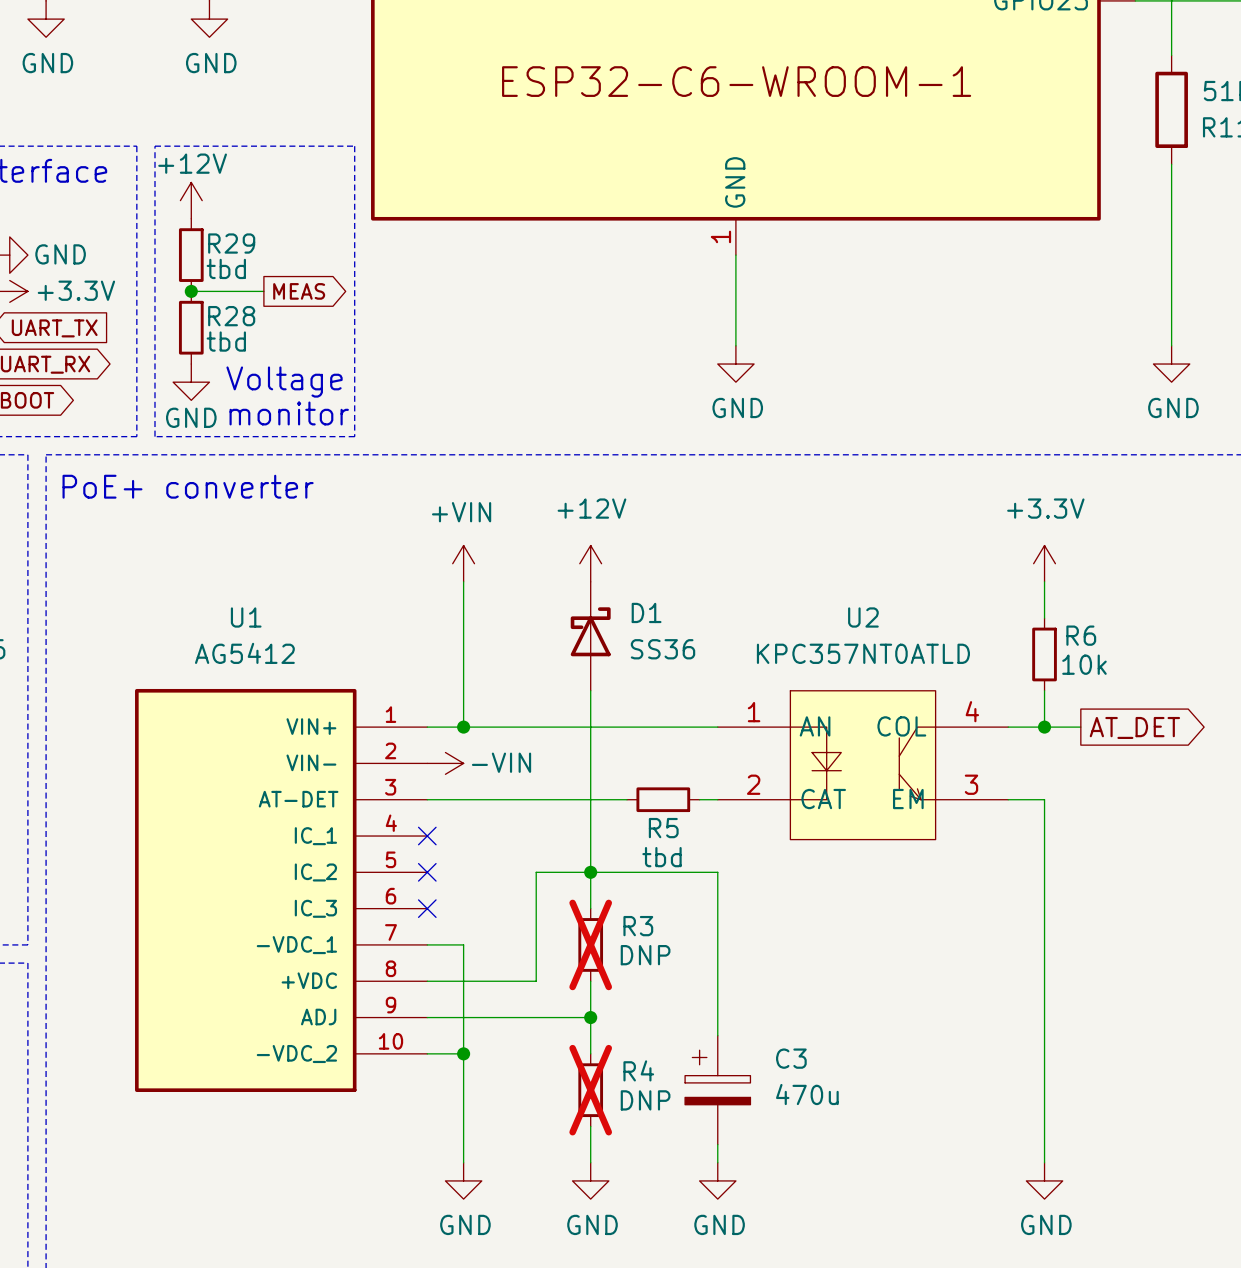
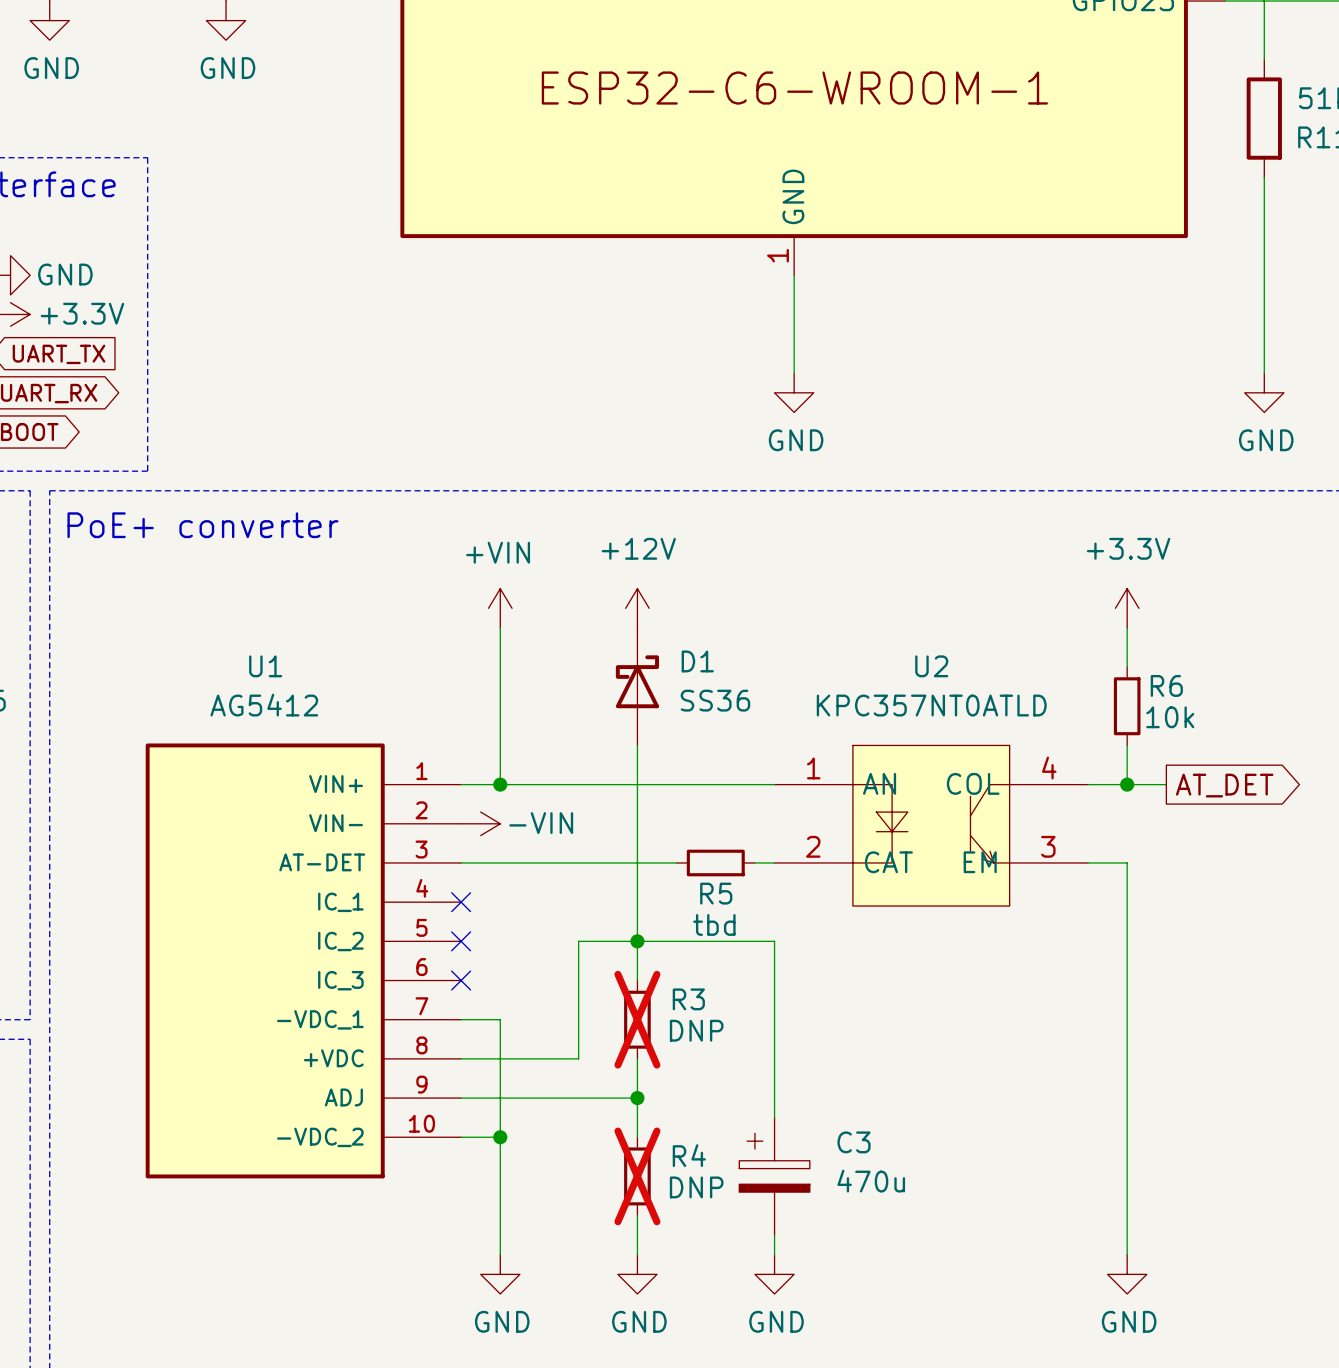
line: (154, 146) (354, 146) (354, 436) (154, 436) (154, 146) -> none
power symbol: +12V (191, 200) -> none
R29: tbd (191, 255) -> none
wire: (191, 291) (263, 291) -> none
junction: (191, 291) -> none
global label: MEAS (299, 291) -> none
R28: tbd (191, 327) -> none
power symbol: GND (191, 382) -> none
text: Voltage (284, 382) -> none
text: monitor (289, 413) -> none

